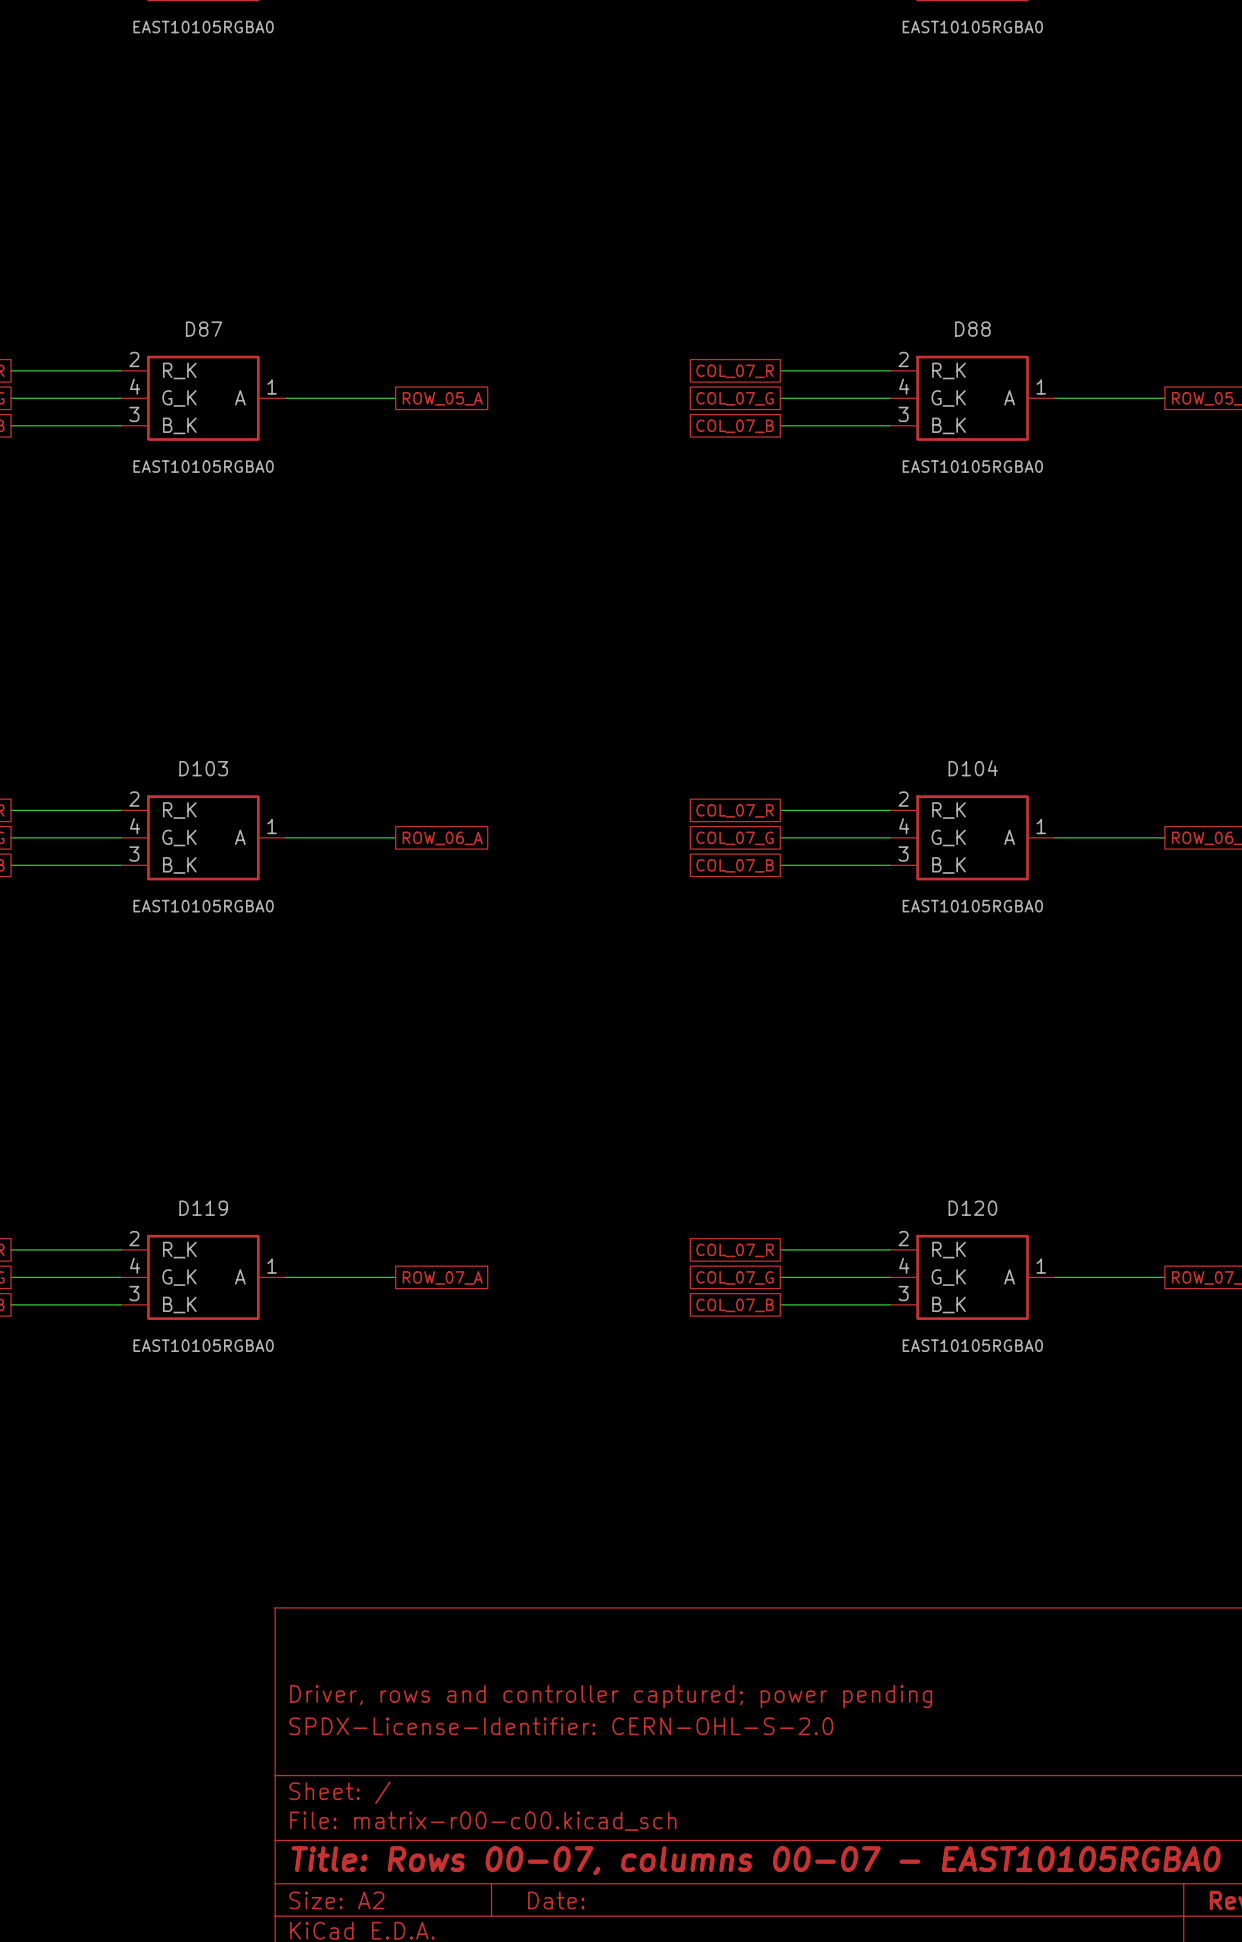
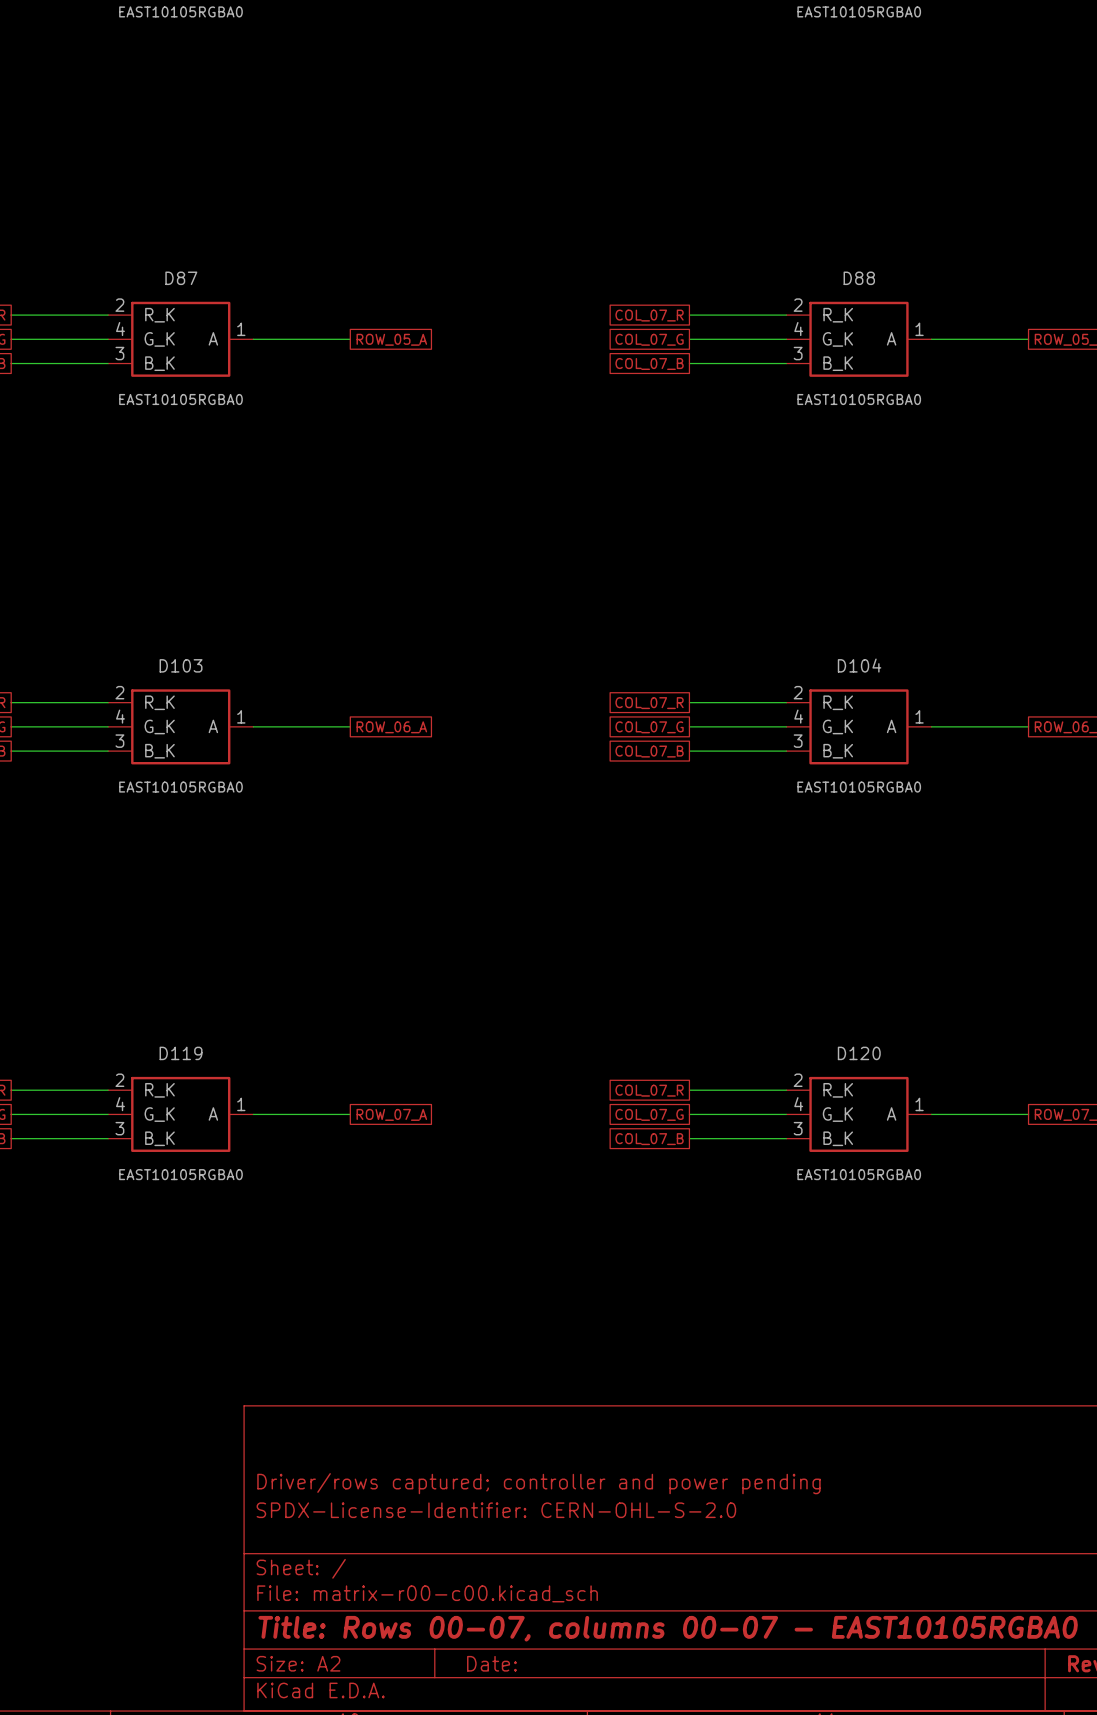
title block: Driver, rows and controller captured; power pending (611, 1696) -> Driver/rows captured; controller and power pending (538, 1483)

